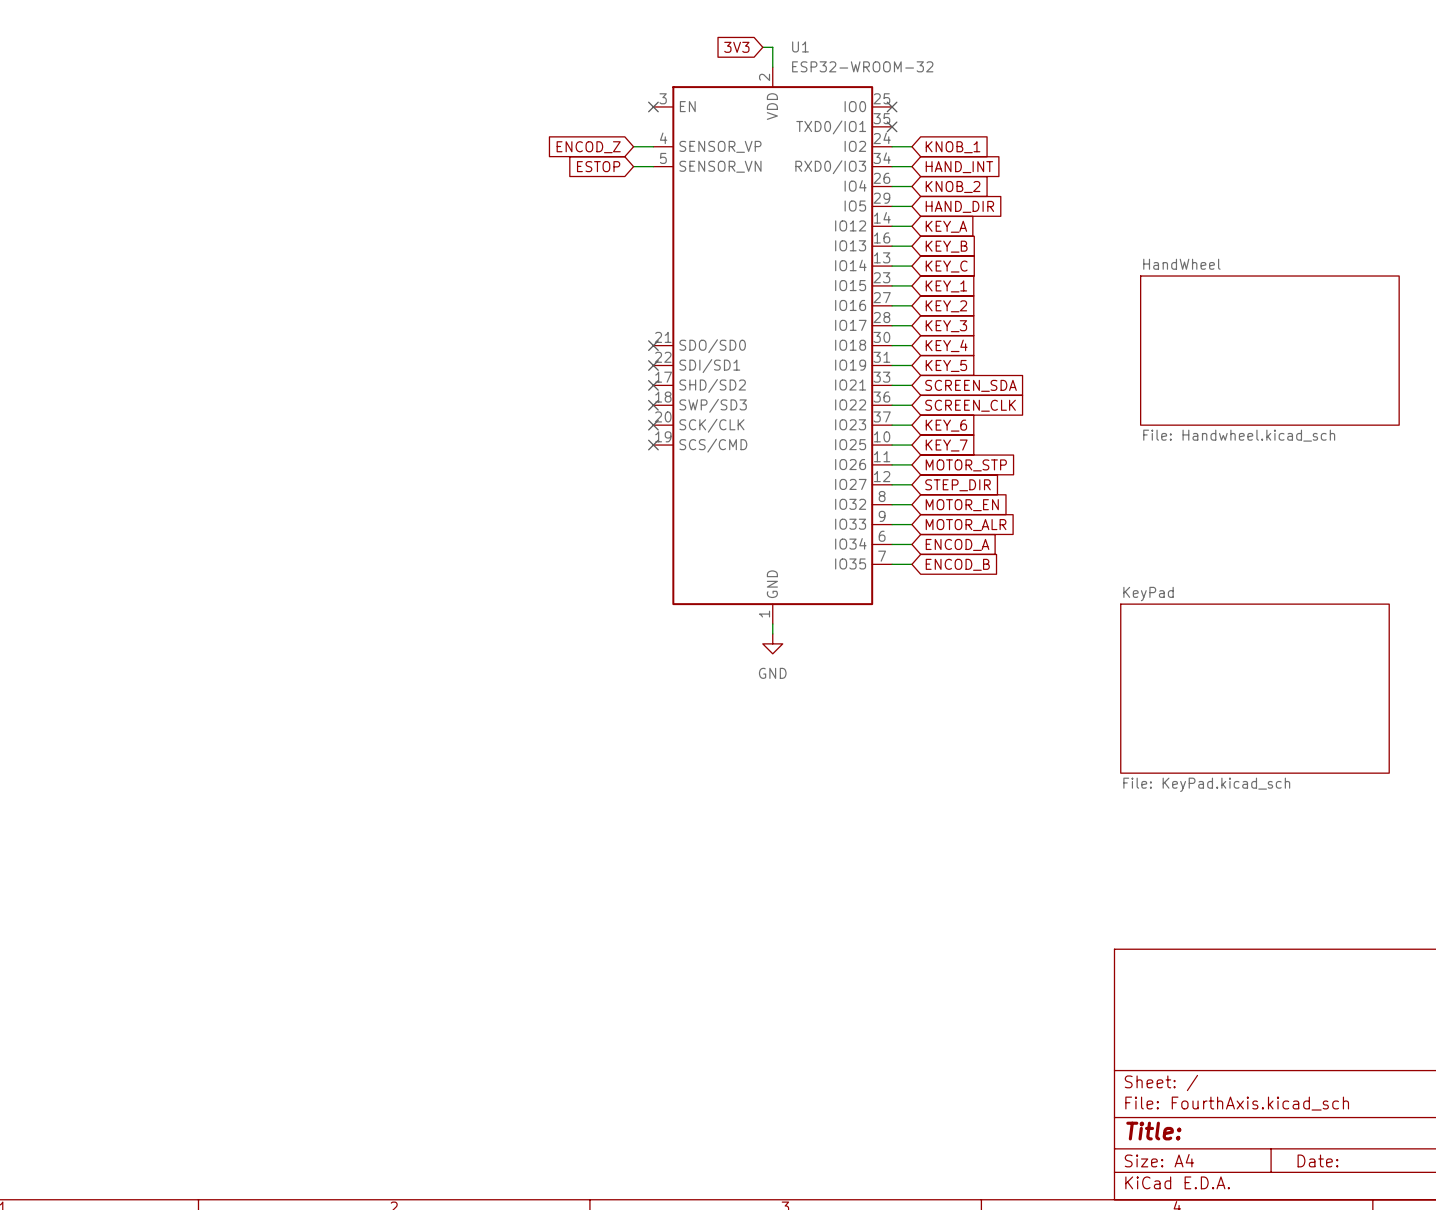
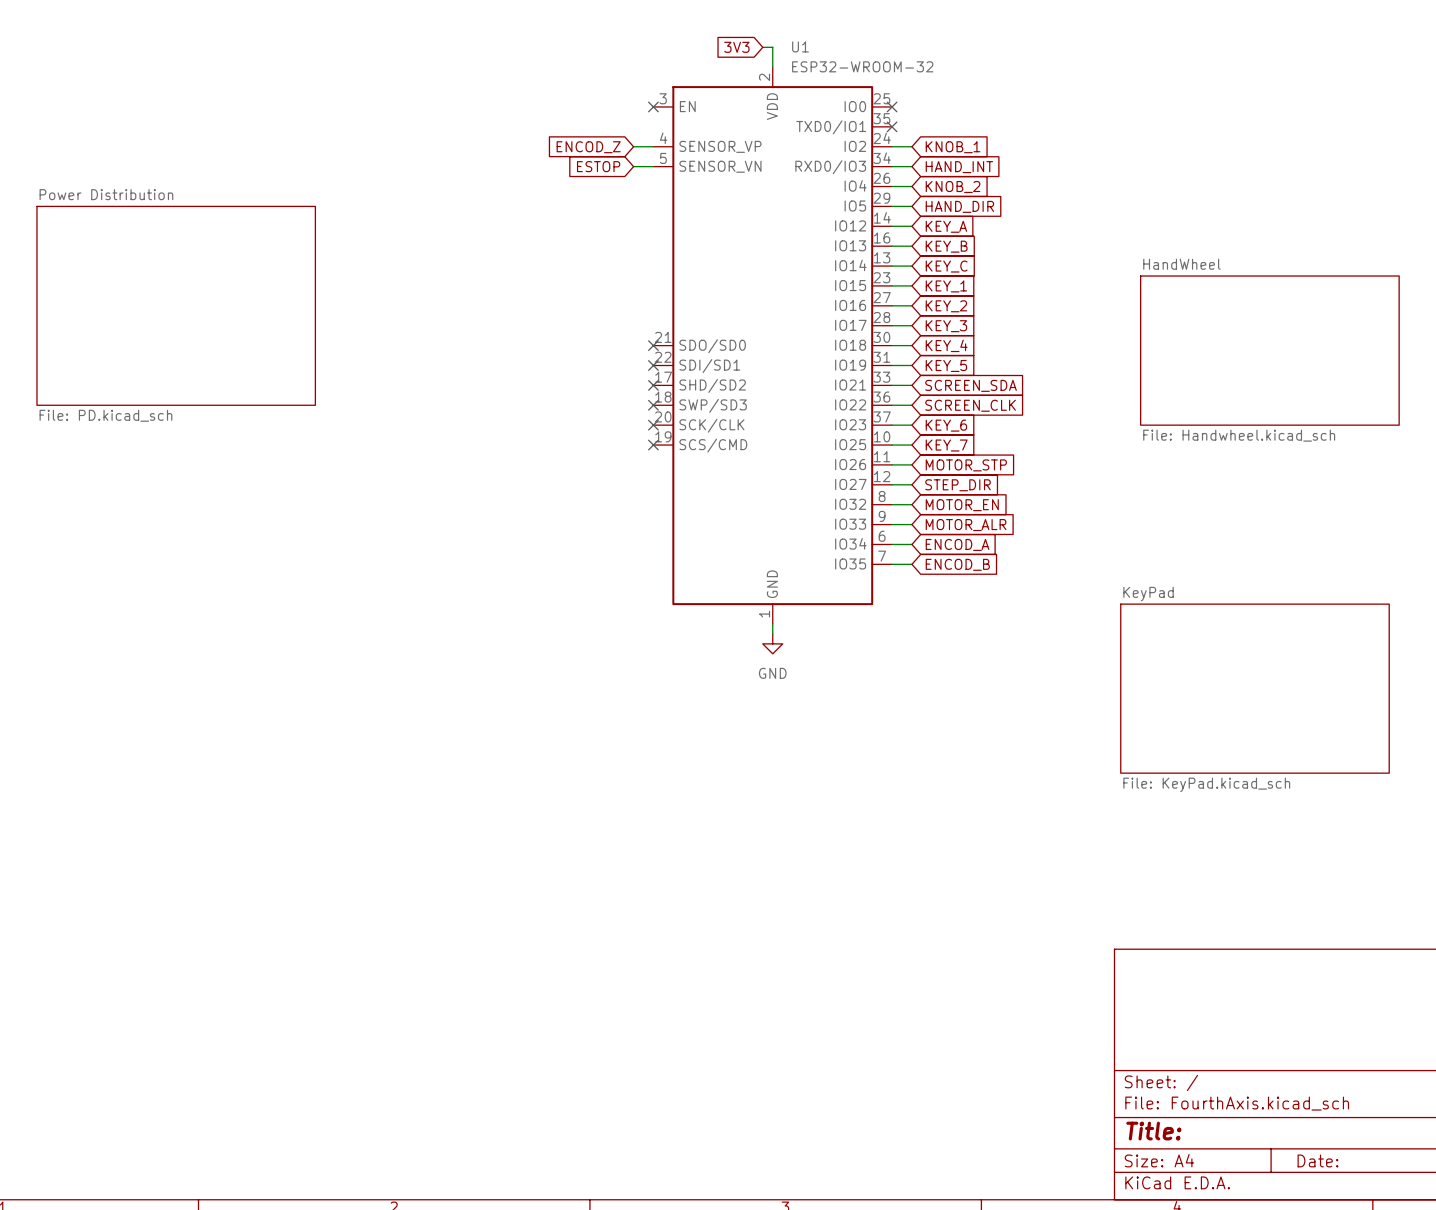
sheet Power Distribution: none -> File: PD.kicad_sch (176, 305)

